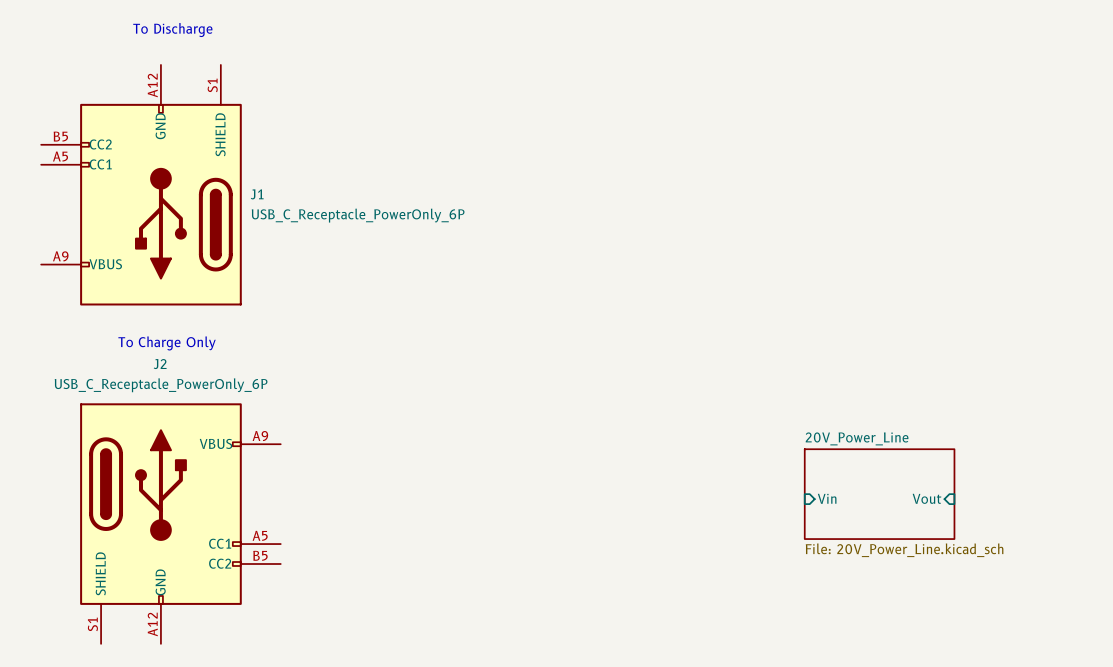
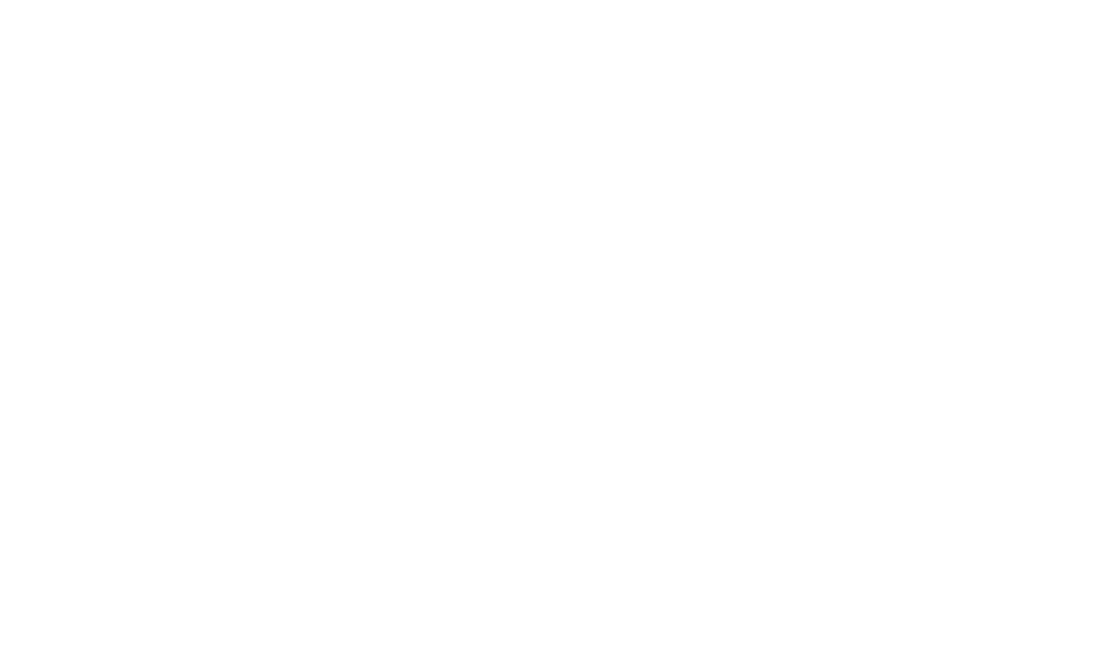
text: To Discharge (172, 30) -> none
J1: USB_C_Receptacle_PowerOnly_6P (141, 185) -> none
text: To Charge Only (167, 343) -> none
sheet 20V_Power_Line: File: 20V_Power_Line.kicad_sch (879, 494) -> none
sheet pin: Vin (827, 498) -> none
sheet pin: Vout (926, 498) -> none
J2: USB_C_Receptacle_PowerOnly_6P (180, 523) -> none

